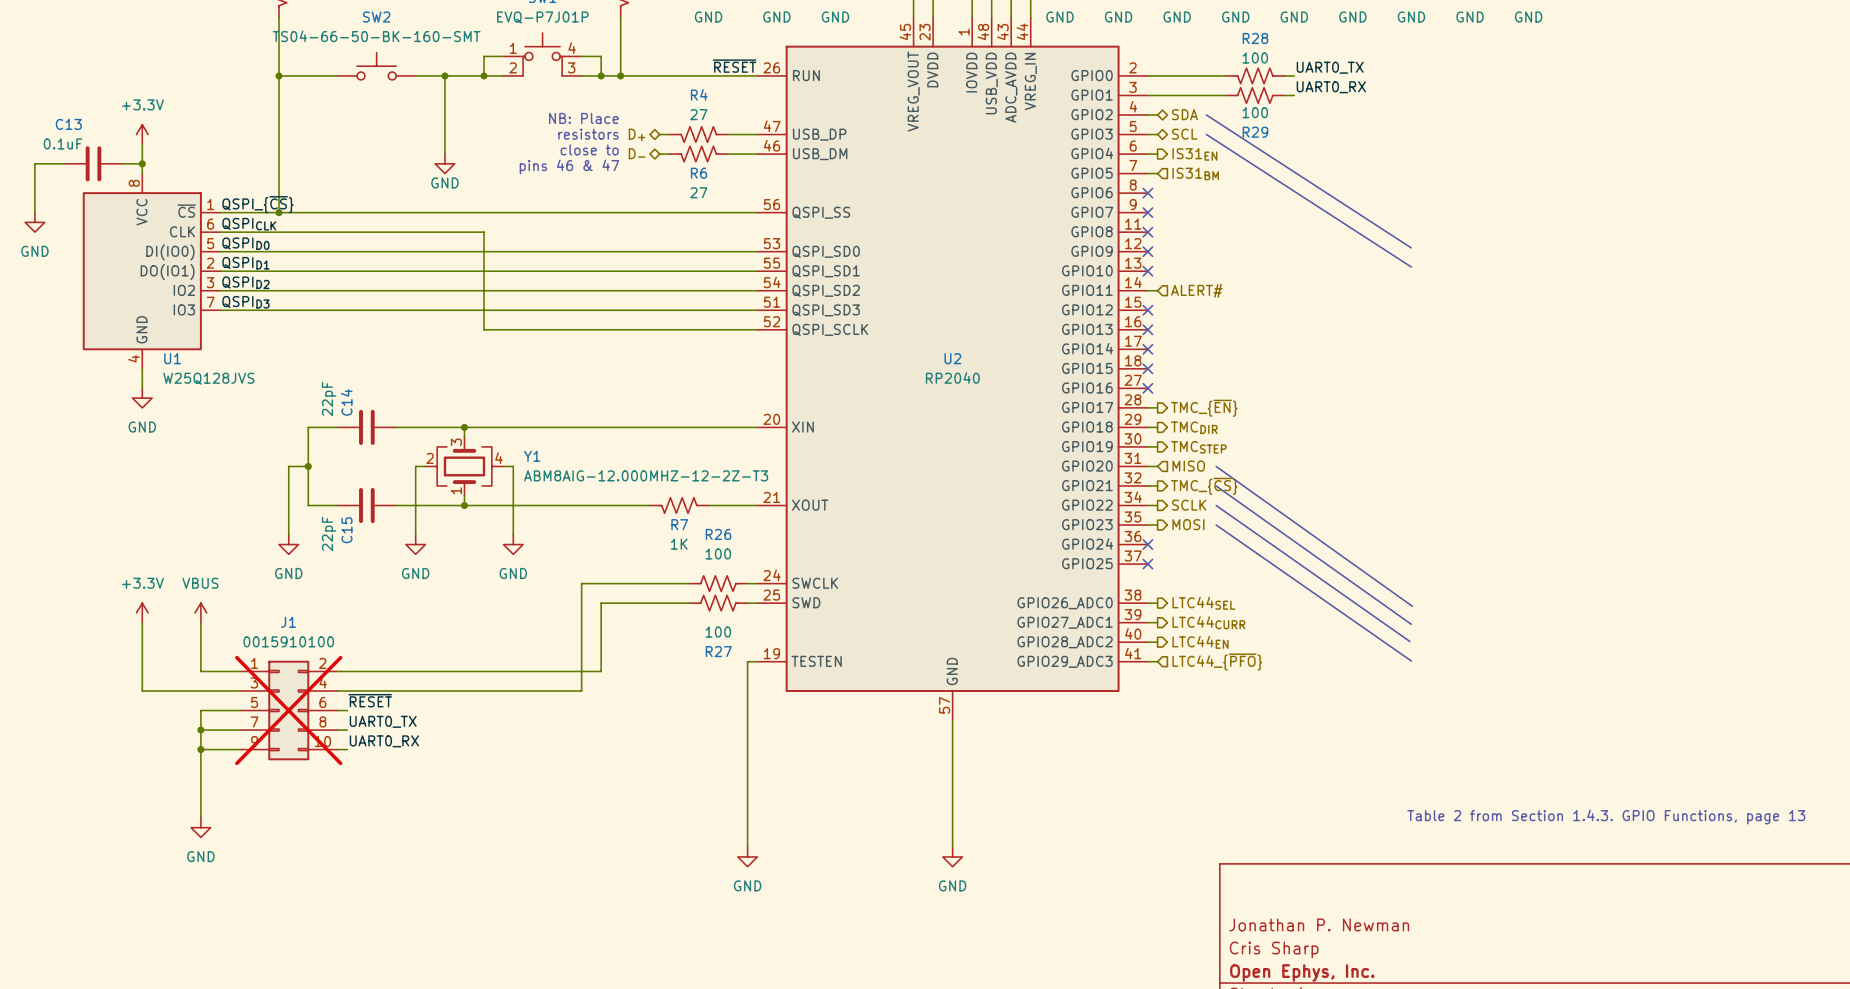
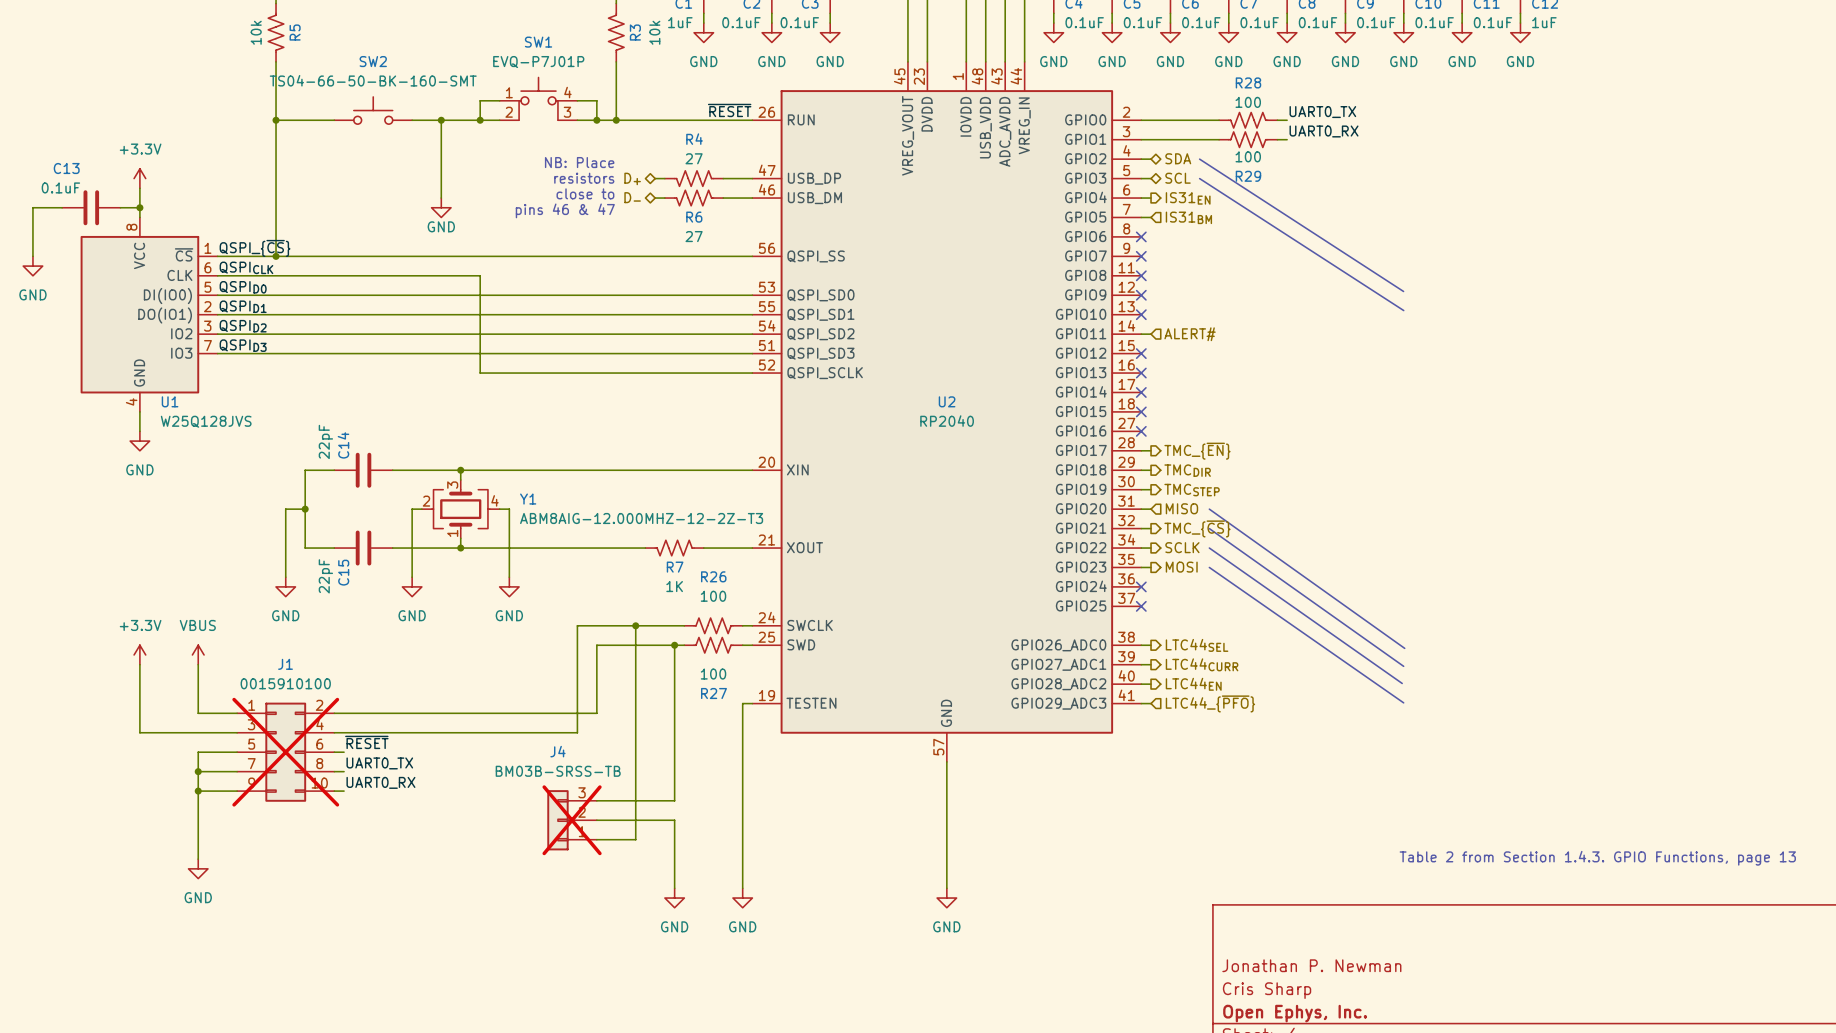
wire: none -> (635, 625) (635, 839) (596, 839)
junction: none -> (635, 625)
wire: none -> (674, 645) (674, 800) (596, 800)
junction: none -> (674, 645)
J4: none -> BM03B-SRSS-TB (572, 820)
wire: none -> (596, 820) (674, 820) (674, 888)
power symbol: none -> GND (674, 898)

